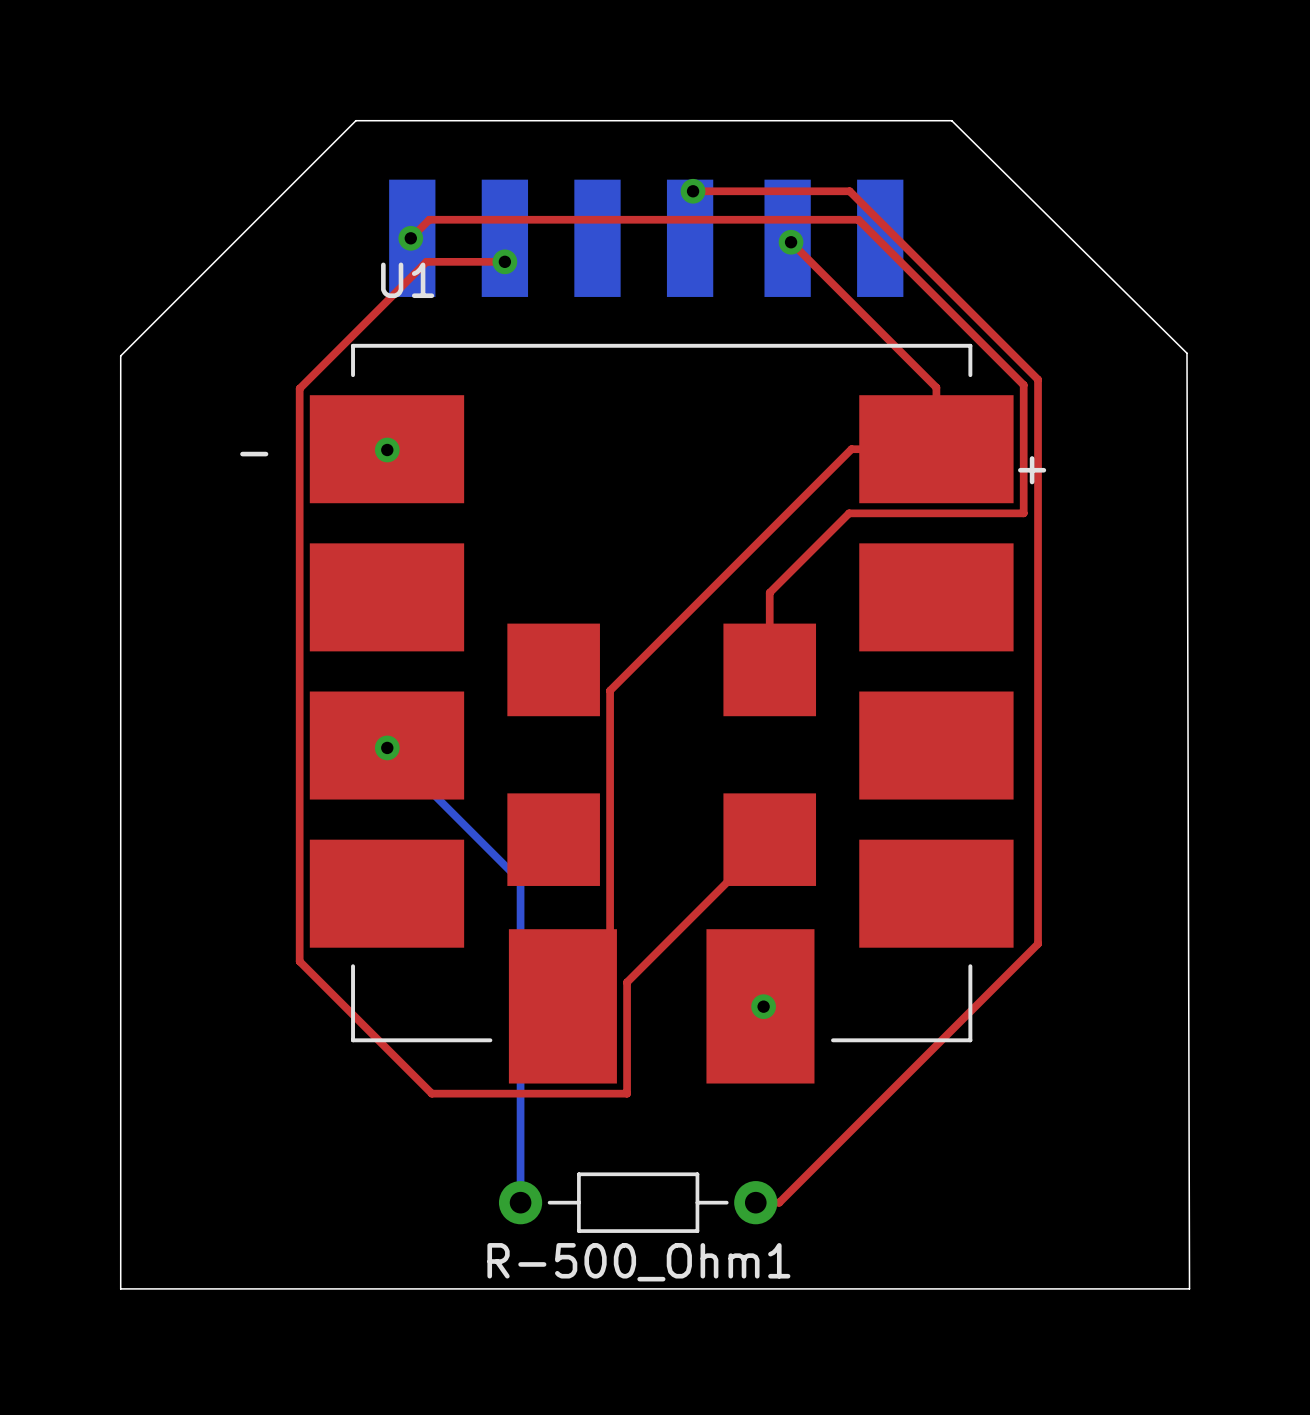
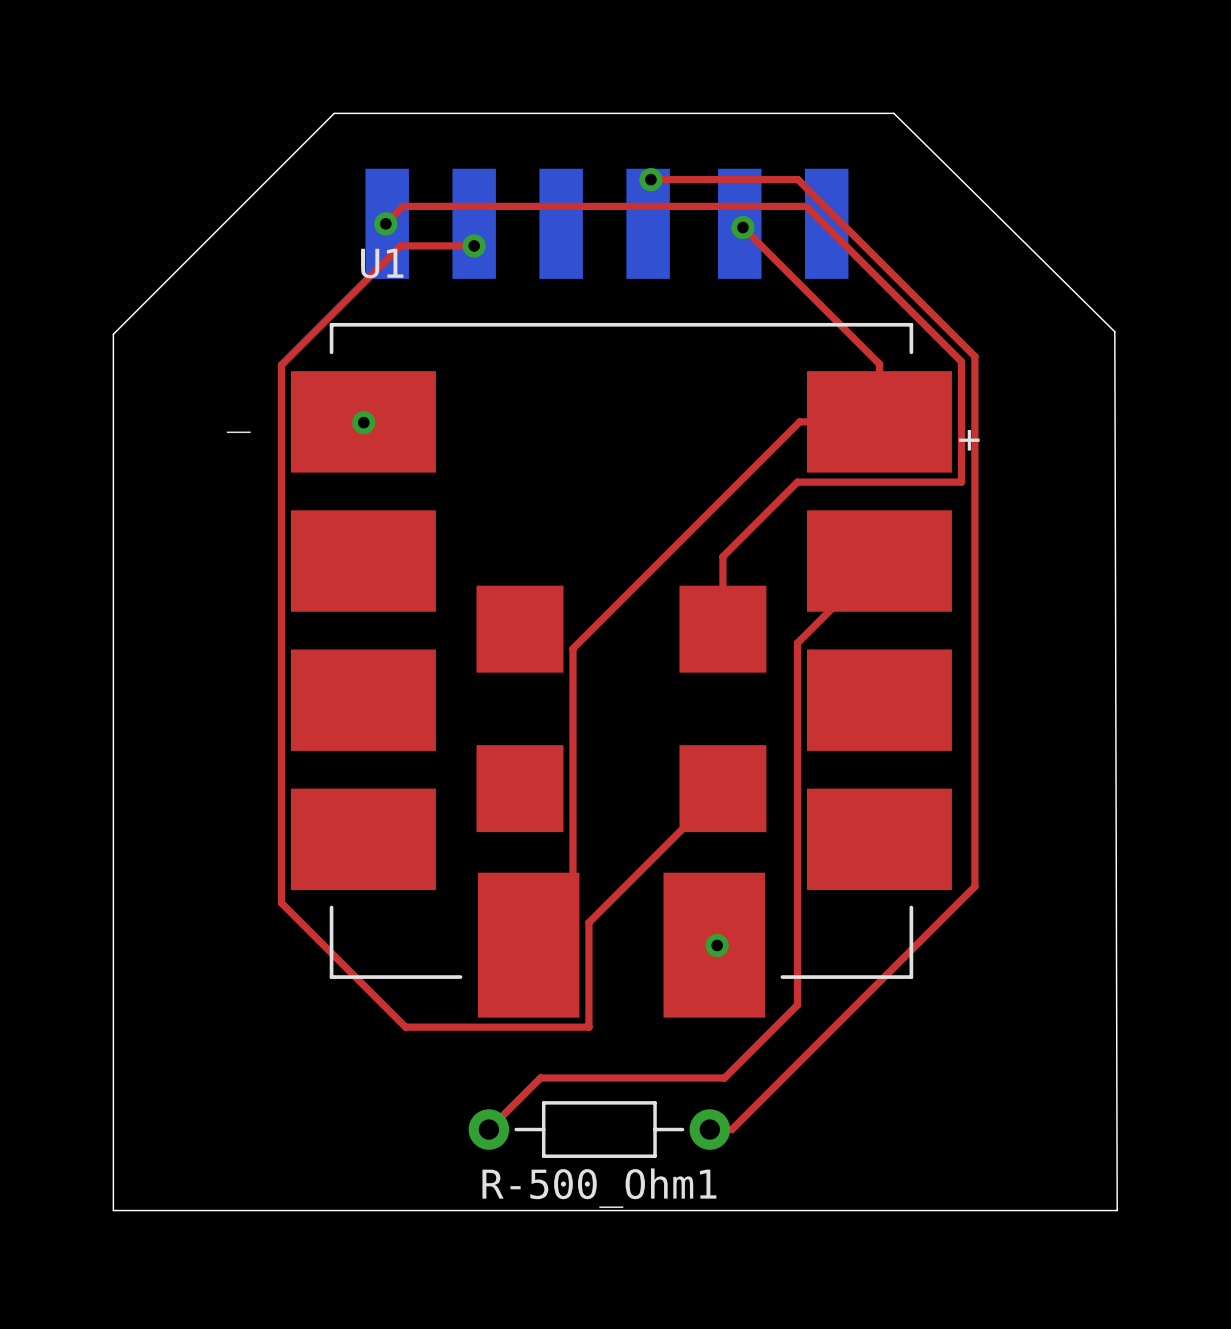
top track: none -> (879, 561) (797, 643) (797, 1005) (724, 1078) (540, 1078) (488, 1129)
bottom track: (387, 747) (520, 881) (520, 1202) -> none
via: (387, 747) -> none

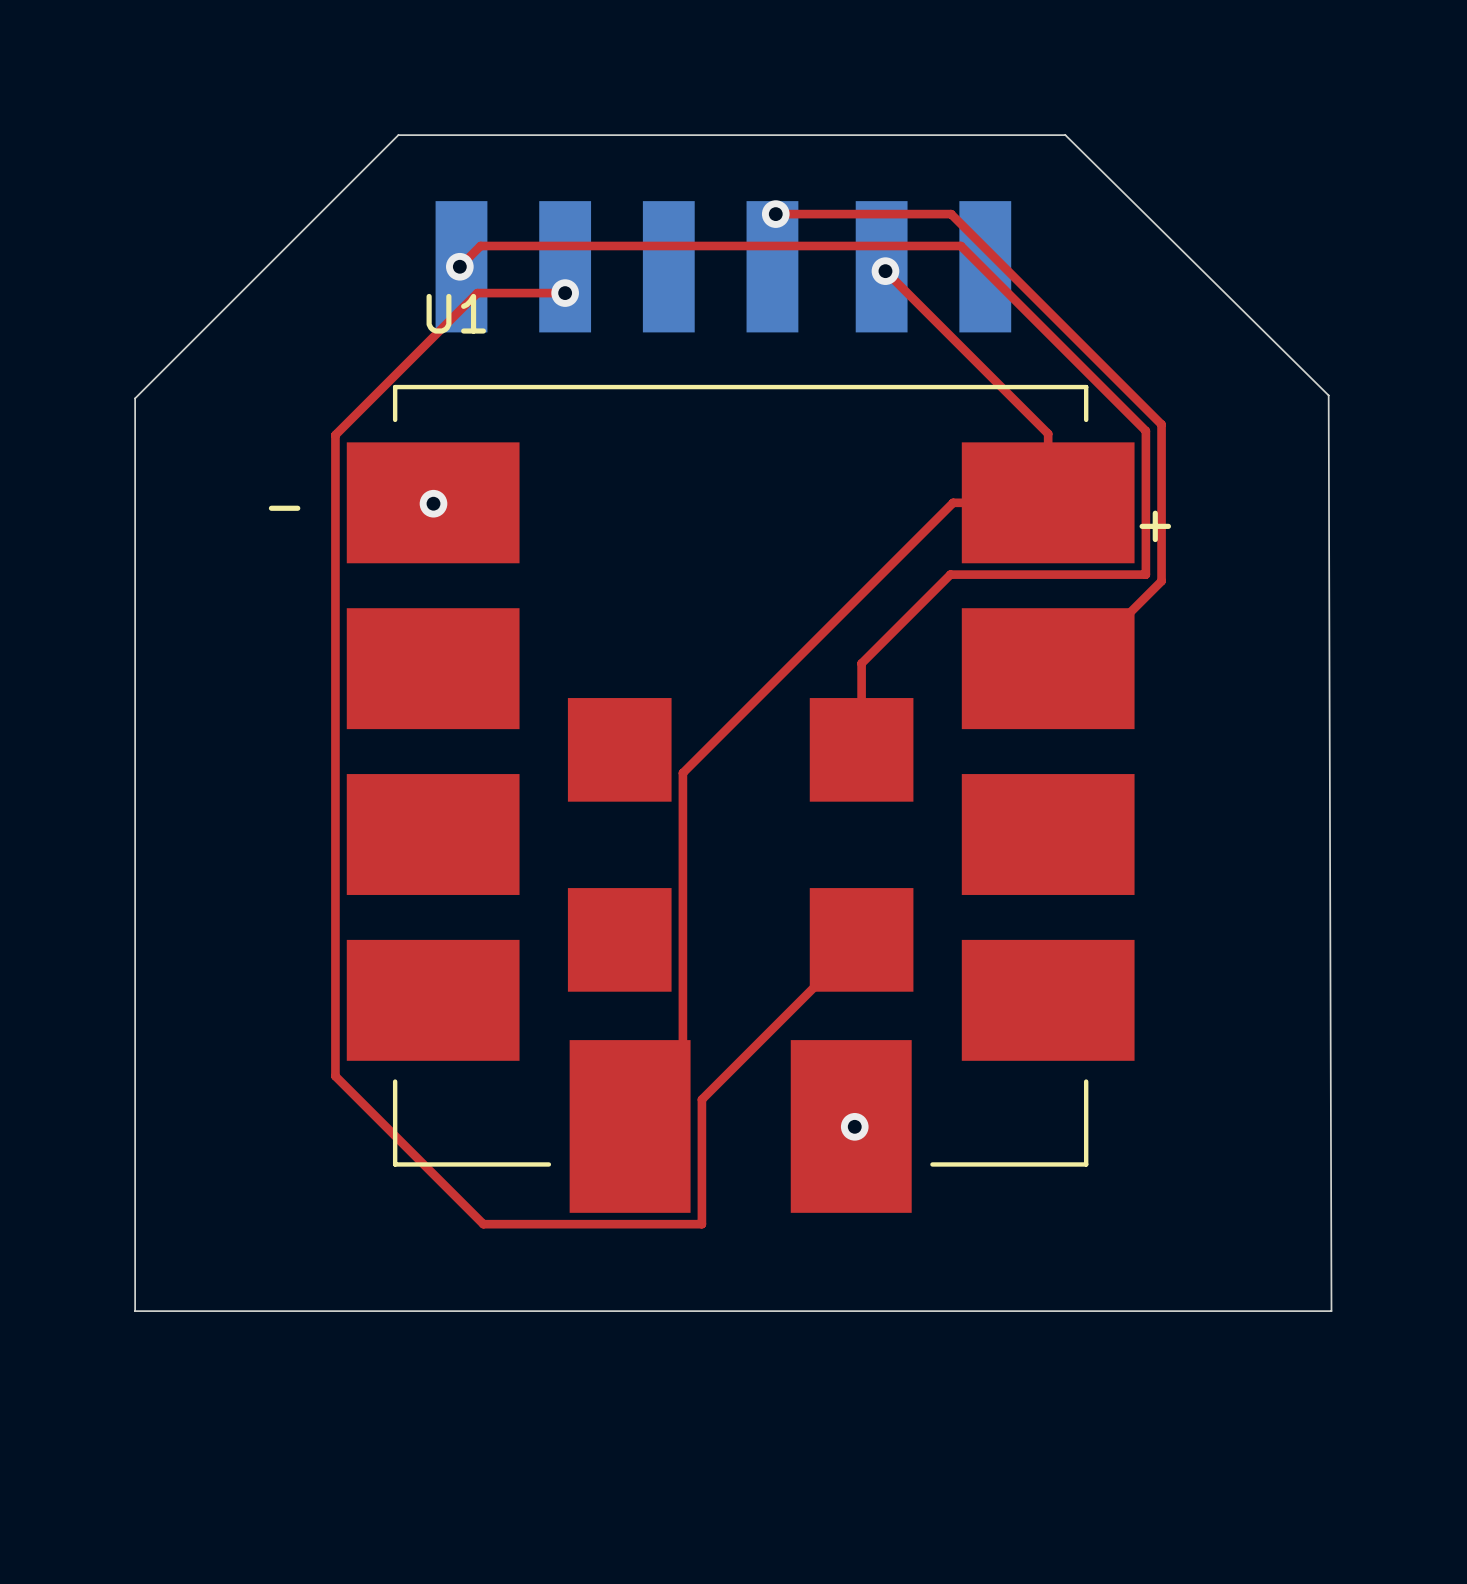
board edge: (1114, 331) (1117, 1210) (113, 1210) (113, 1100) -> (1328, 395) (1331, 1311) (135, 1311)
top track: (974, 356) (974, 886) (731, 1129) (709, 1129) -> (1161, 424) (1161, 581) (1074, 668) (1048, 668)
top track: (879, 561) (797, 643) (797, 1005) (724, 1078) (540, 1078) (488, 1129) -> none
R-500_Ohm1: (599, 1129) -> none

